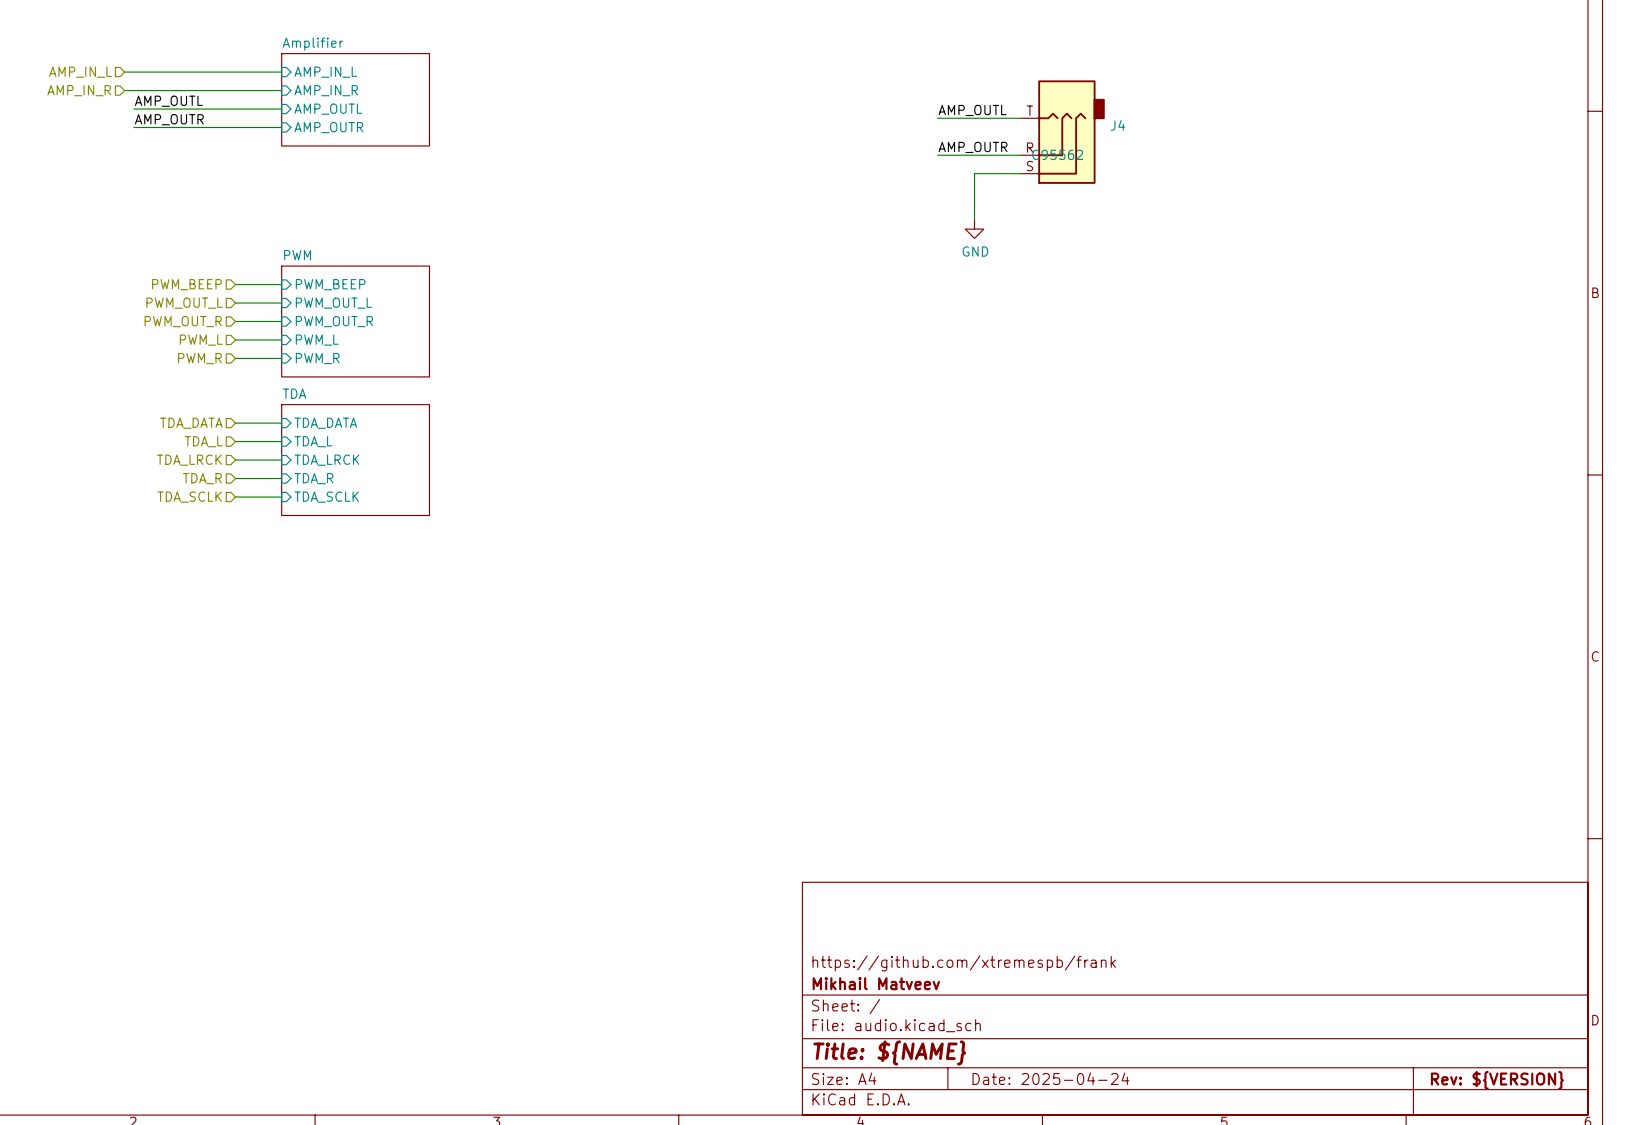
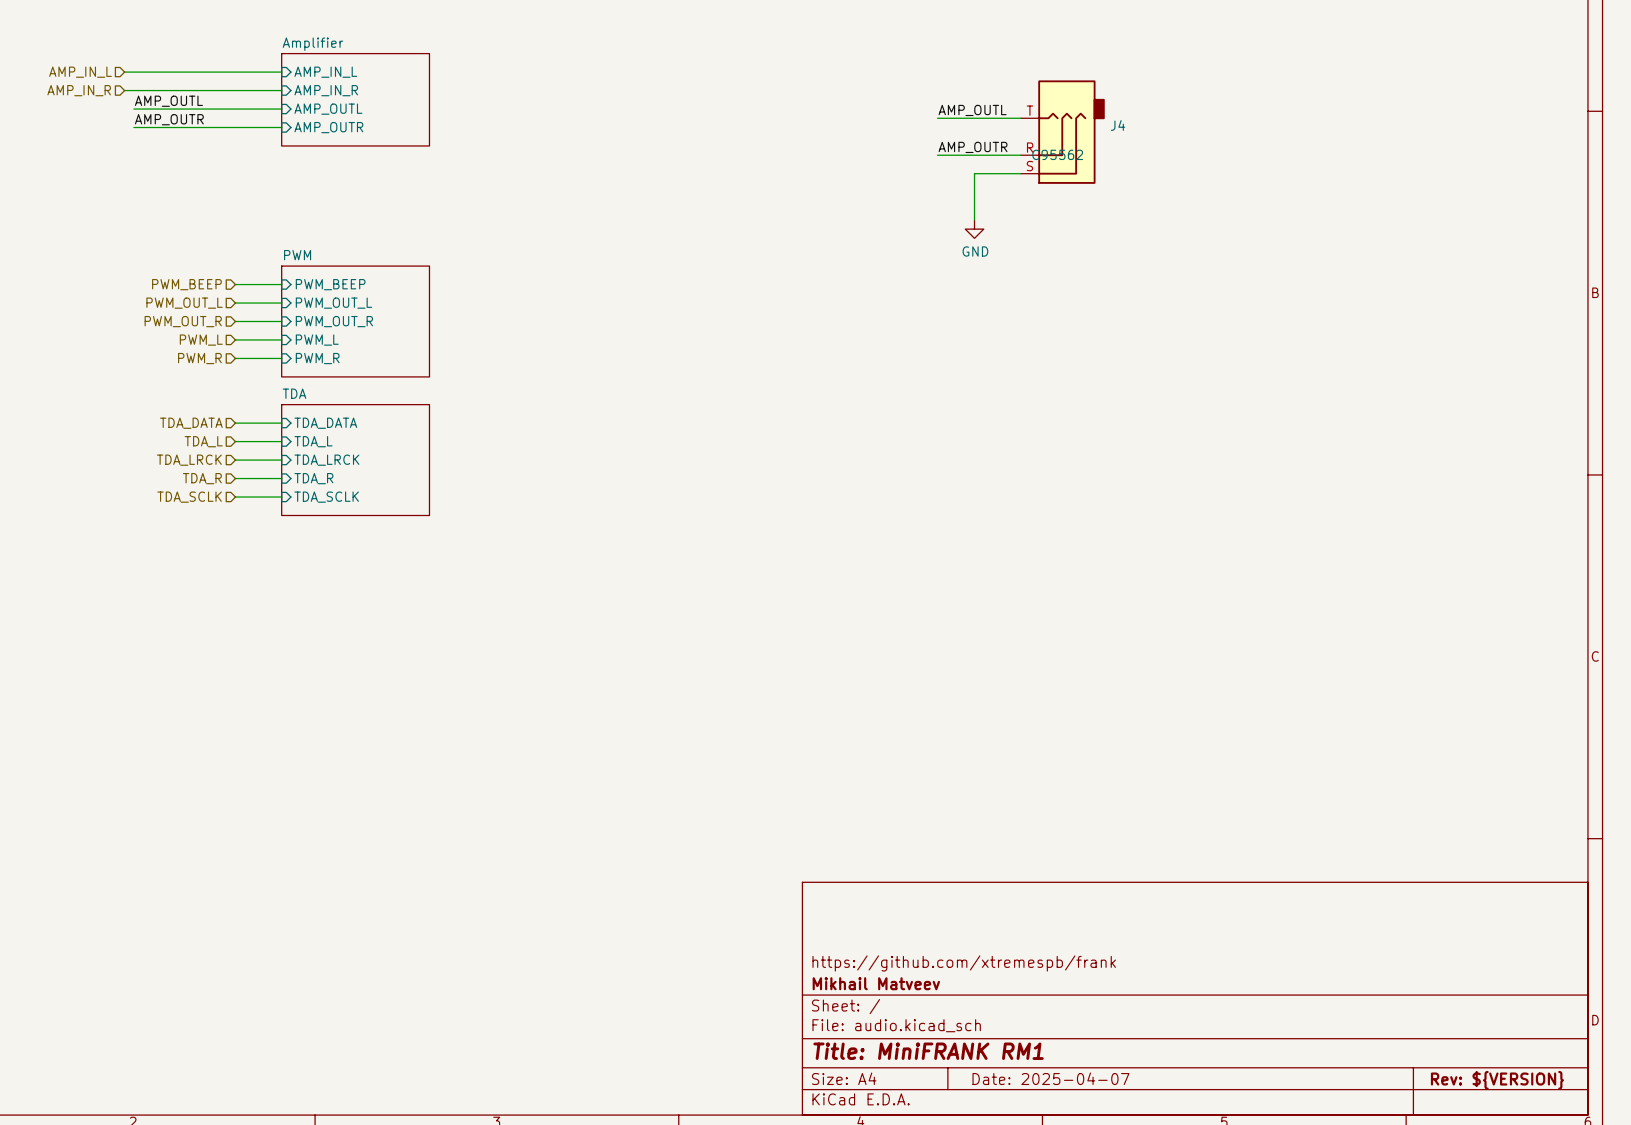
title block: Title: ${NAME} (889, 1052) -> Title: MiniFRANK RM1 (928, 1051)
title block: Date: 2025-04-24 (1050, 1078) -> Date: 2025-04-07 (1050, 1078)

